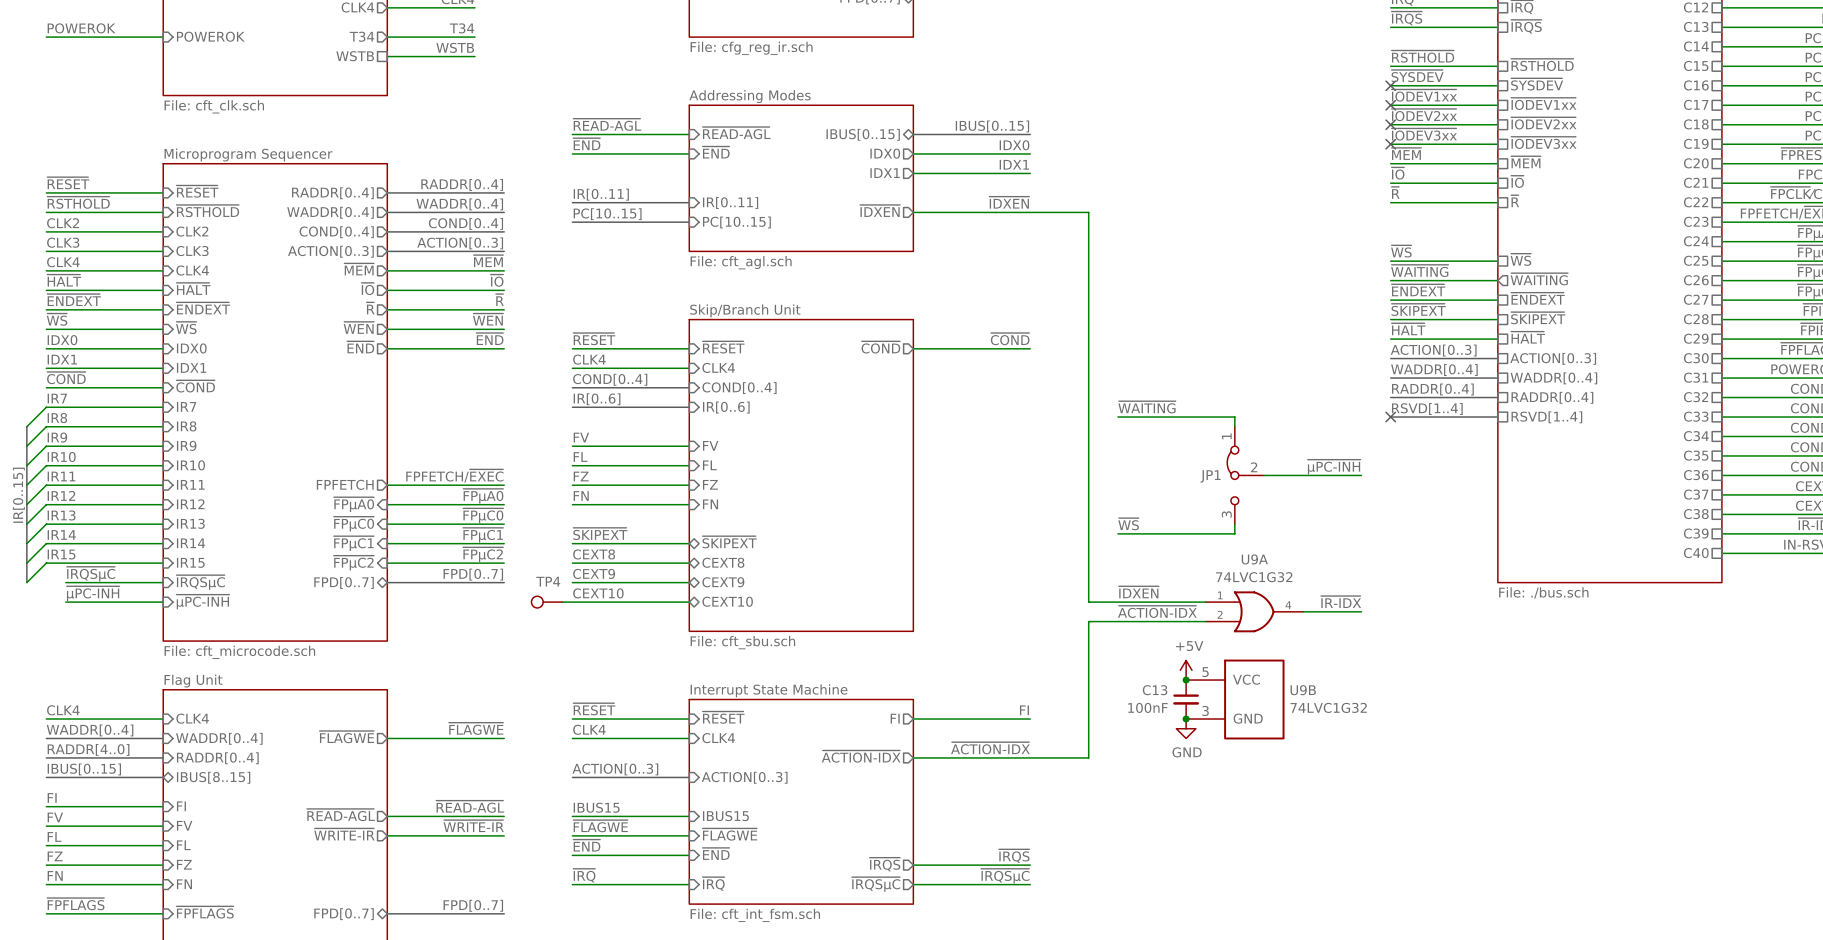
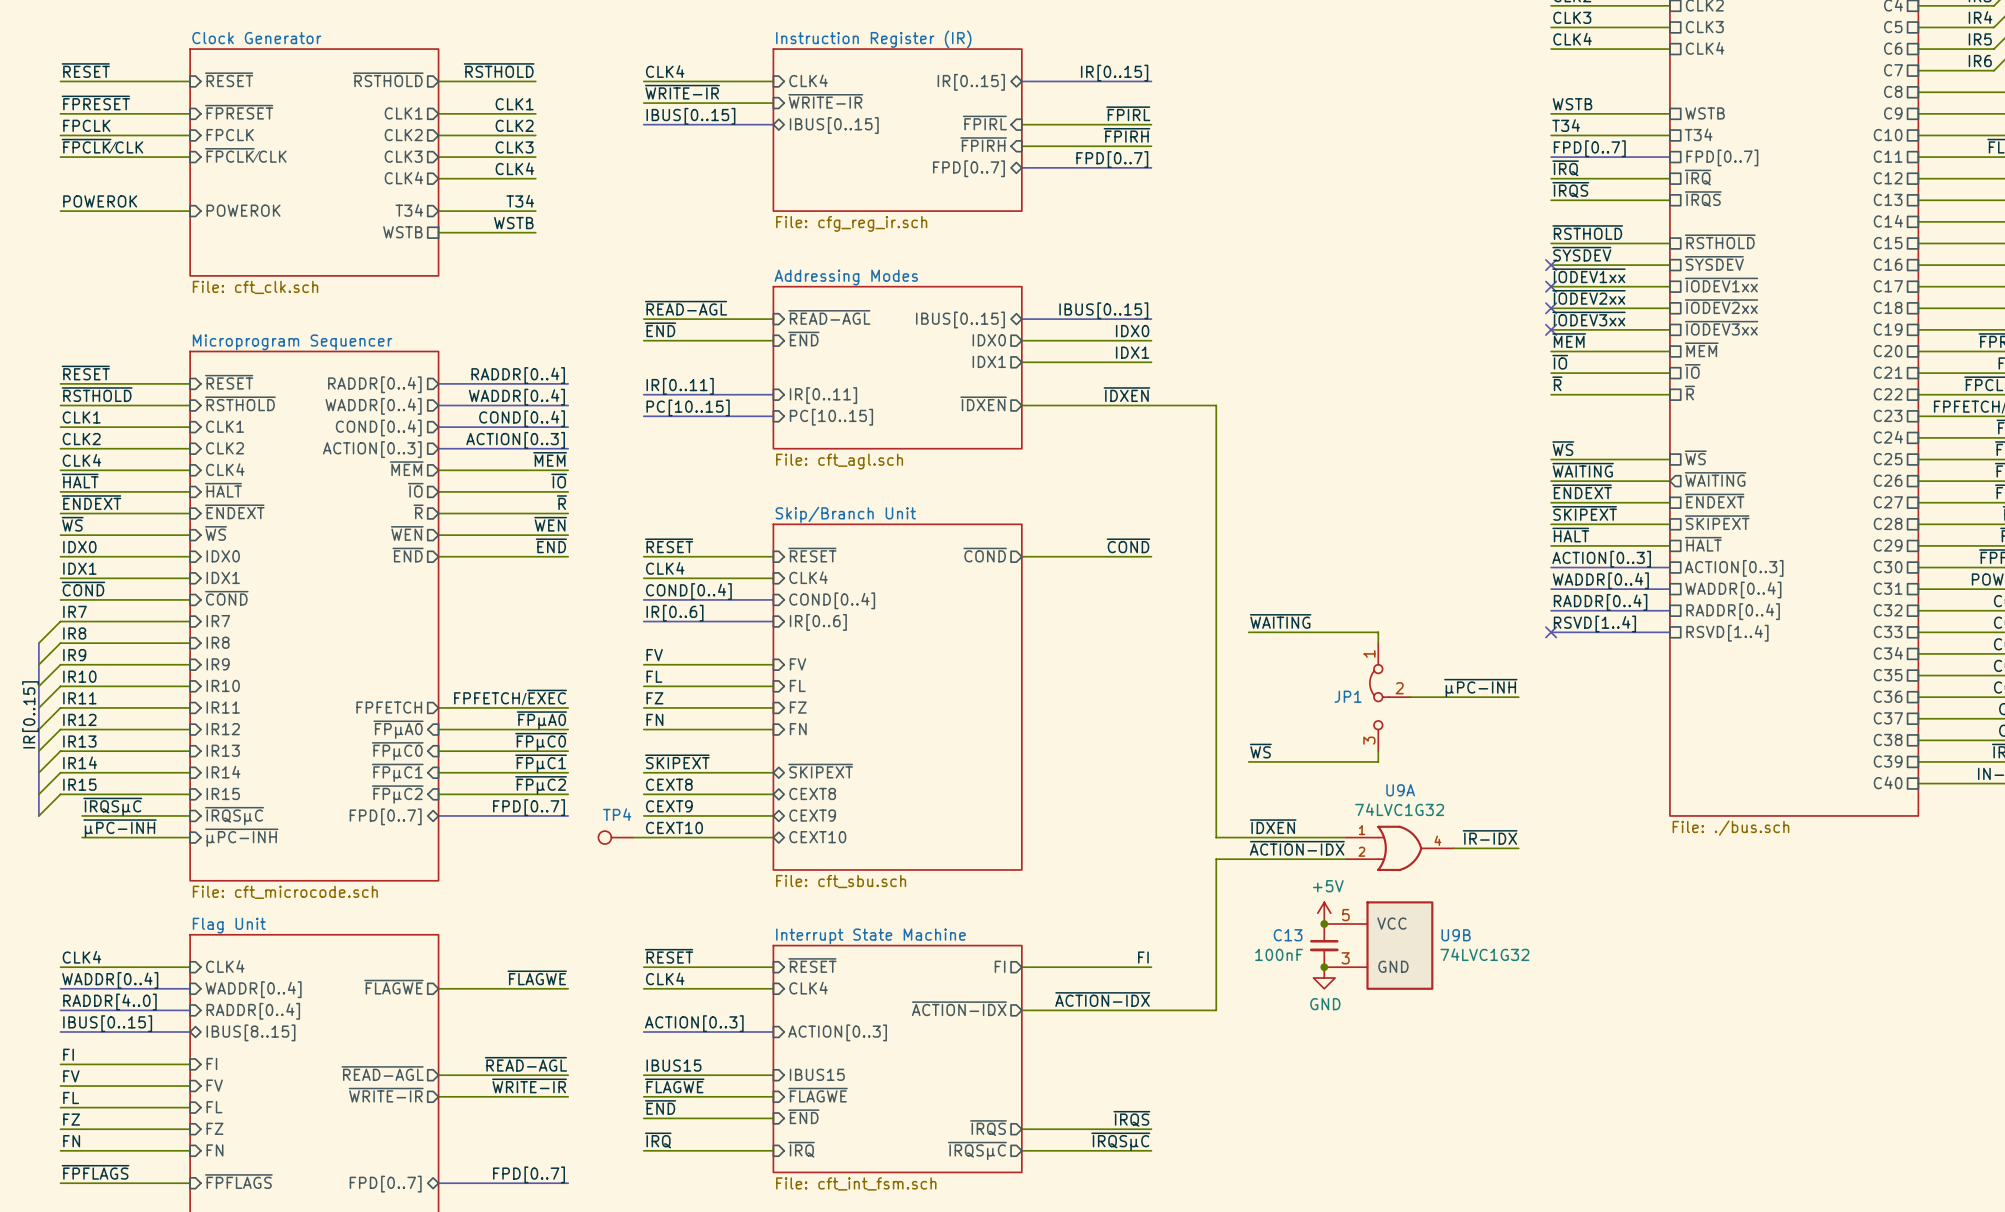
label: CLK2 (63, 223) -> CLK1 (81, 417)
sheet pin: CLK2 (192, 231) -> CLK1 (225, 426)
label: CLK3 (63, 242) -> CLK2 (81, 439)
sheet pin: CLK3 (192, 251) -> CLK2 (225, 448)

